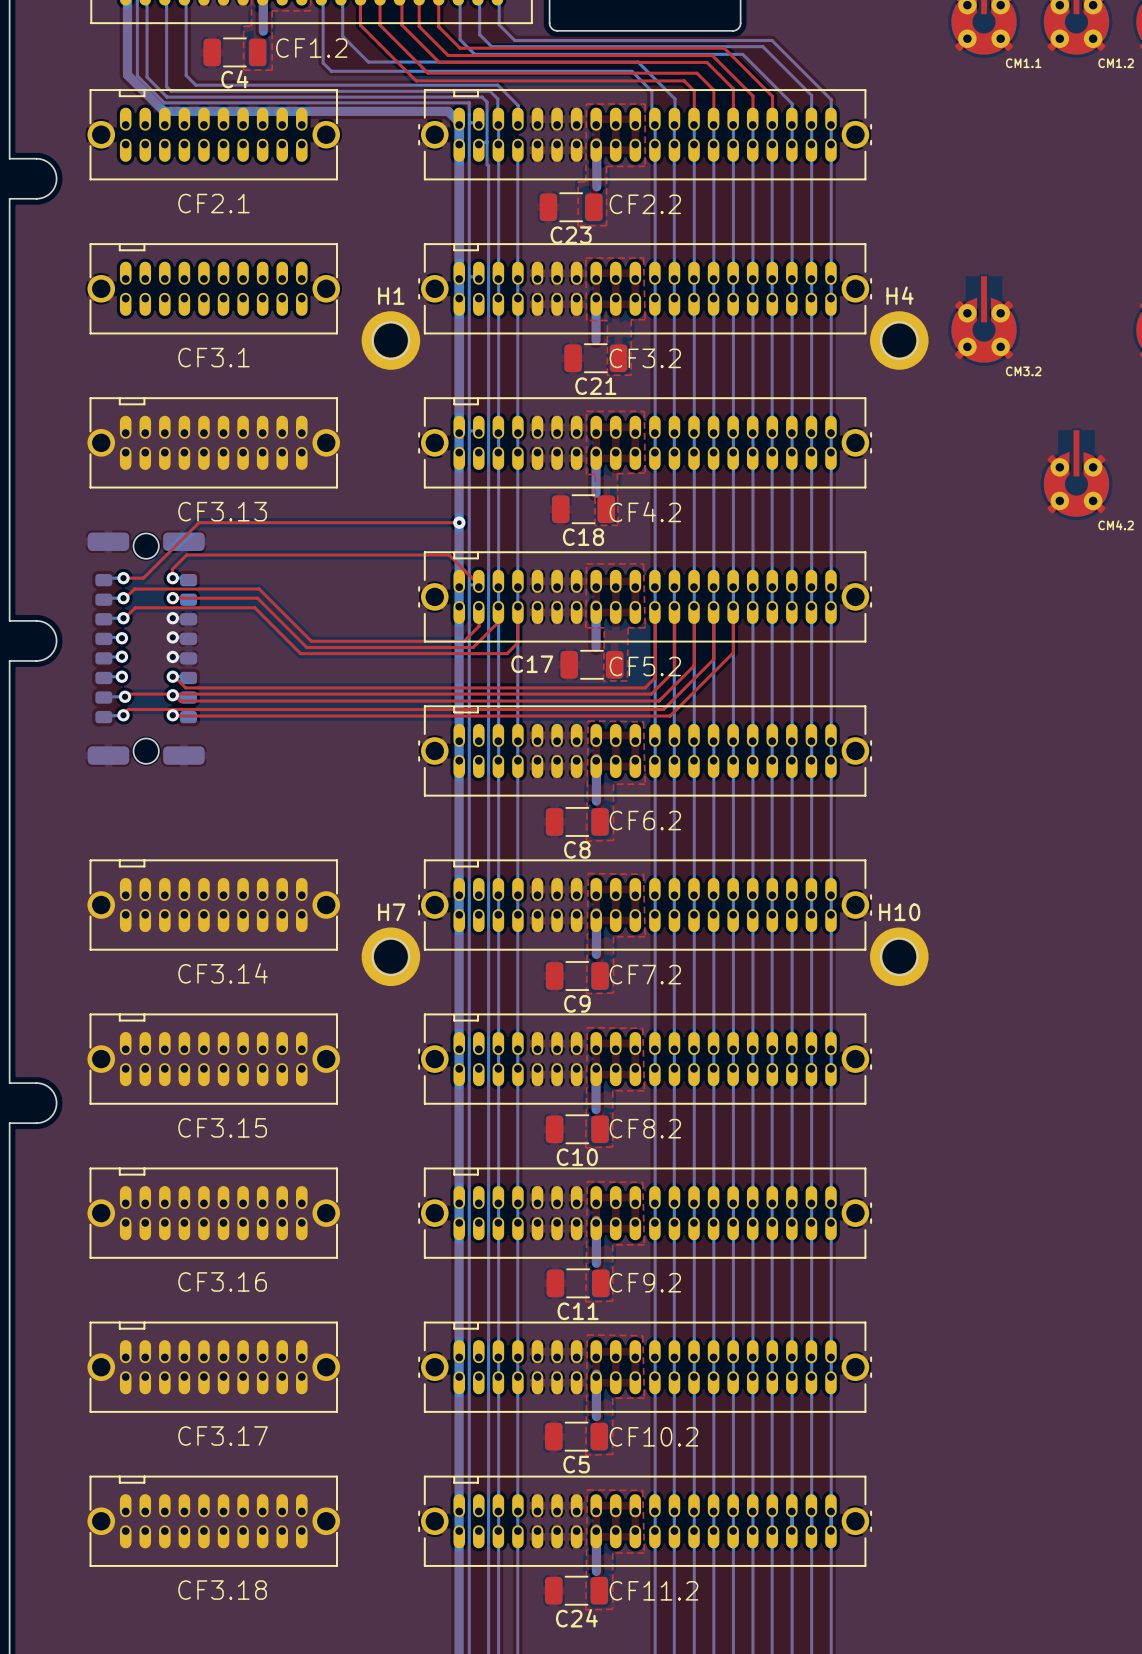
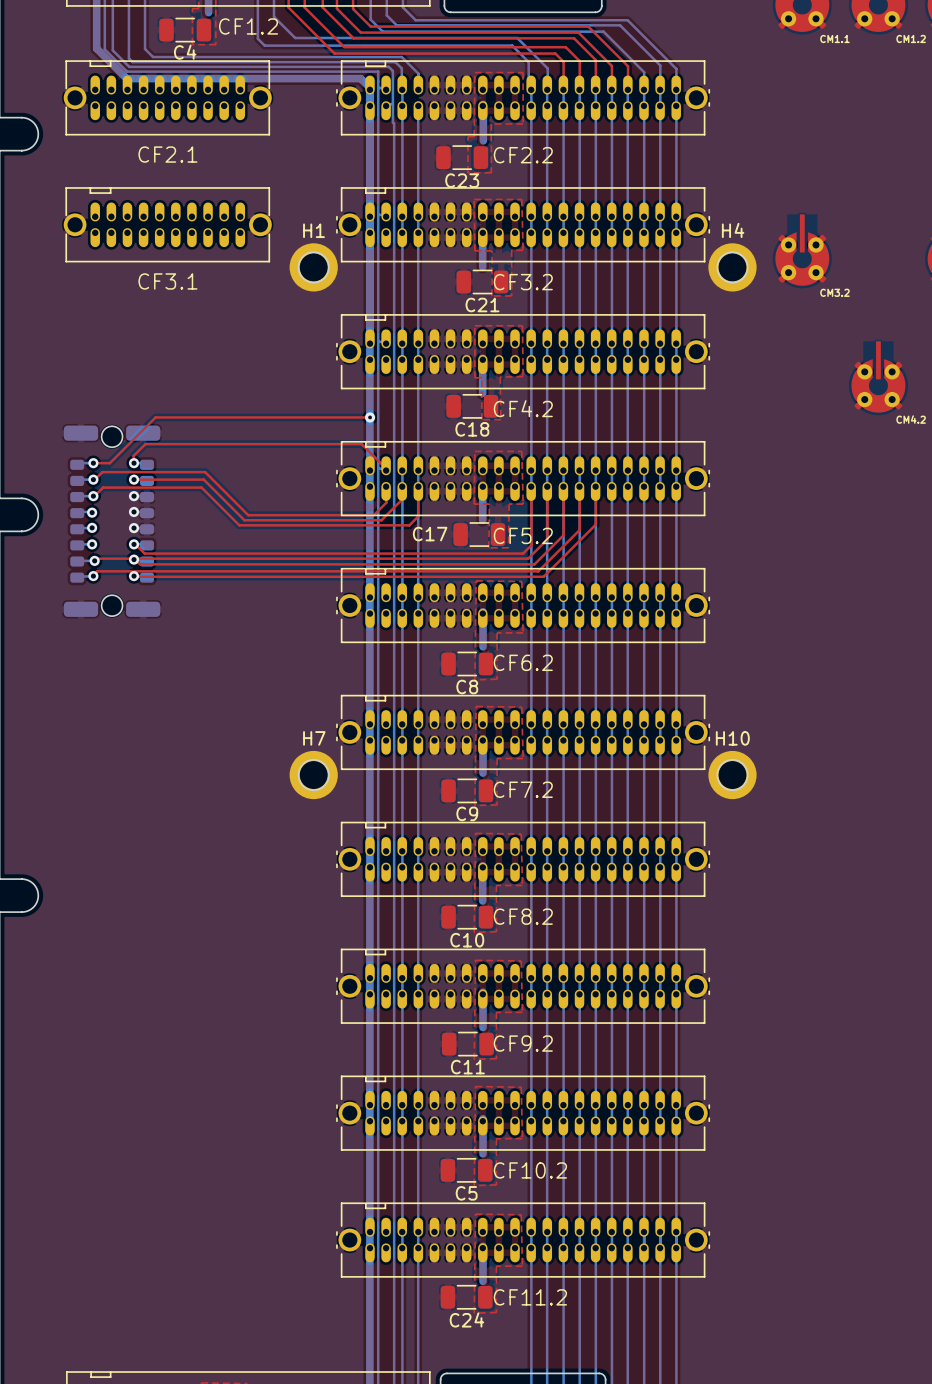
CF3.13: (213, 442) -> none
CF3.14: (213, 905) -> none
CF3.15: (213, 1059) -> none
CF3.16: (213, 1213) -> none
CF3.17: (213, 1367) -> none
CF3.18: (213, 1521) -> none

